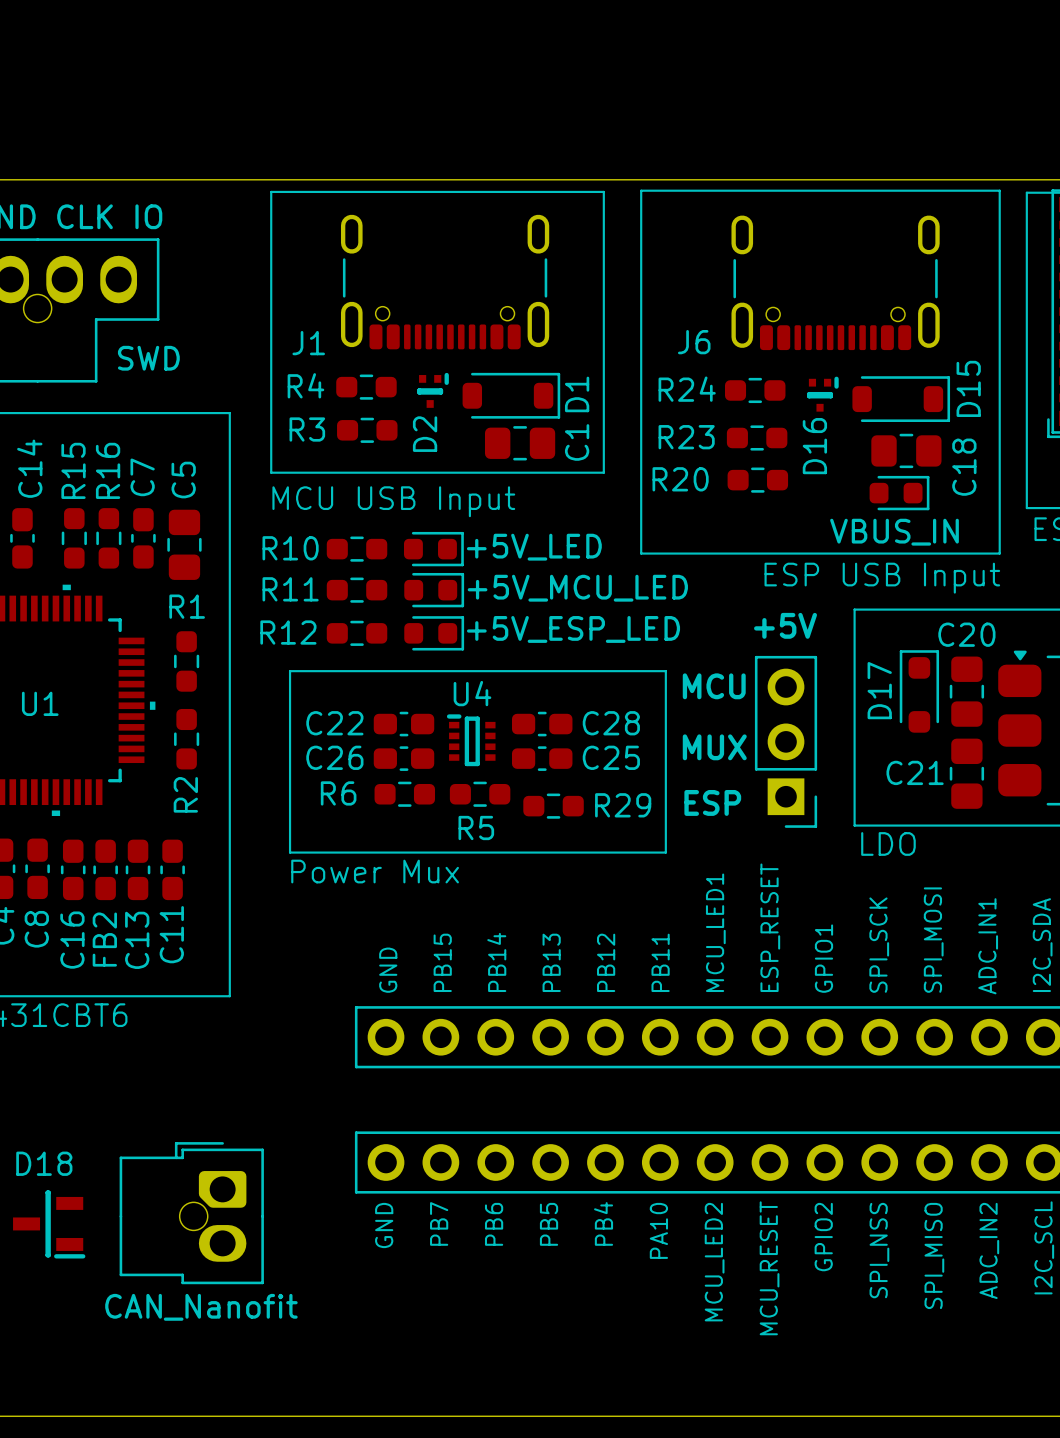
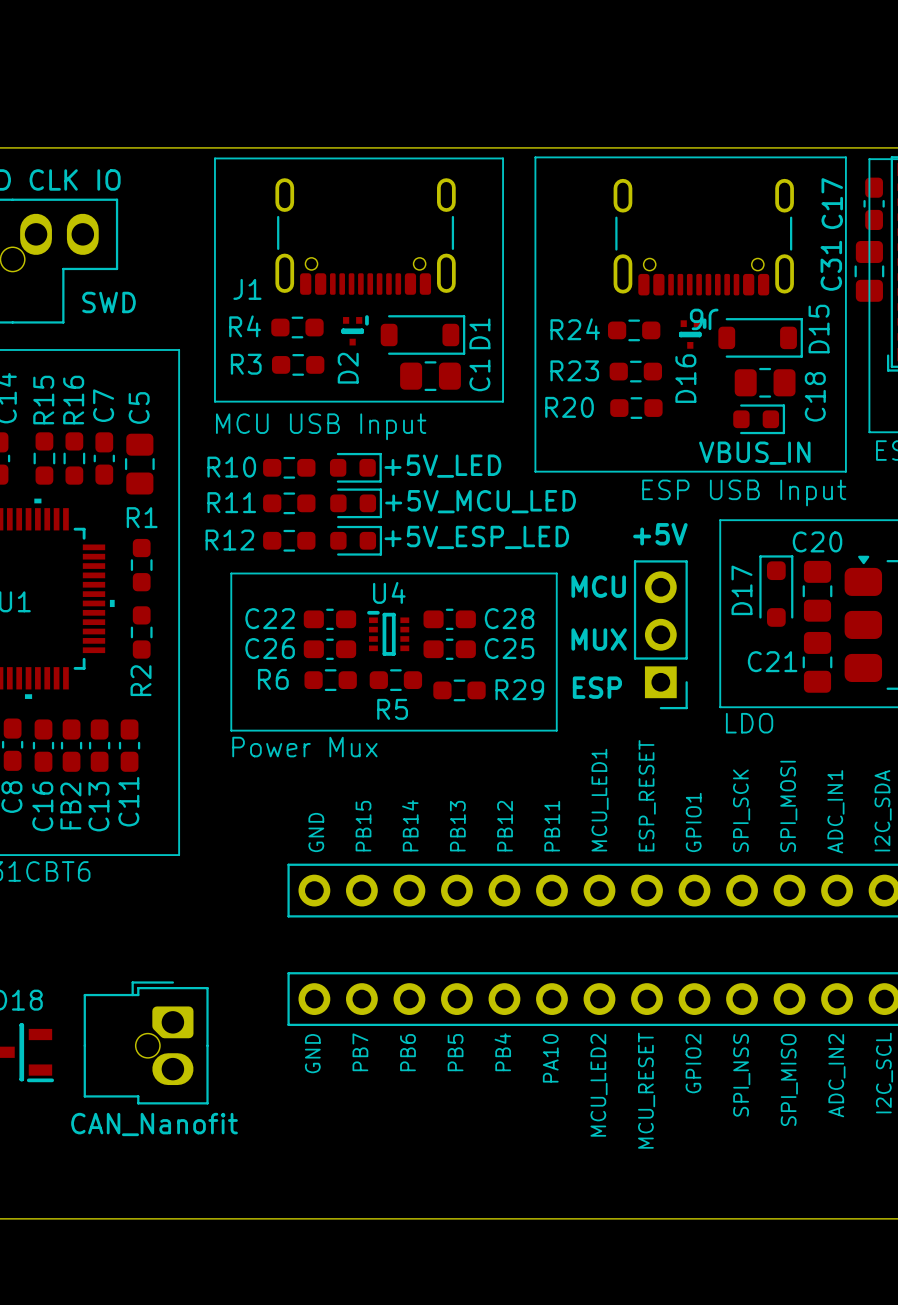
C17: none -> (874, 203)
C31: none -> (869, 271)
J6 name rotation: 0° (694, 342) -> 180° (704, 319)
J6 name position: J6 (694, 342) -> J6 (704, 319)

